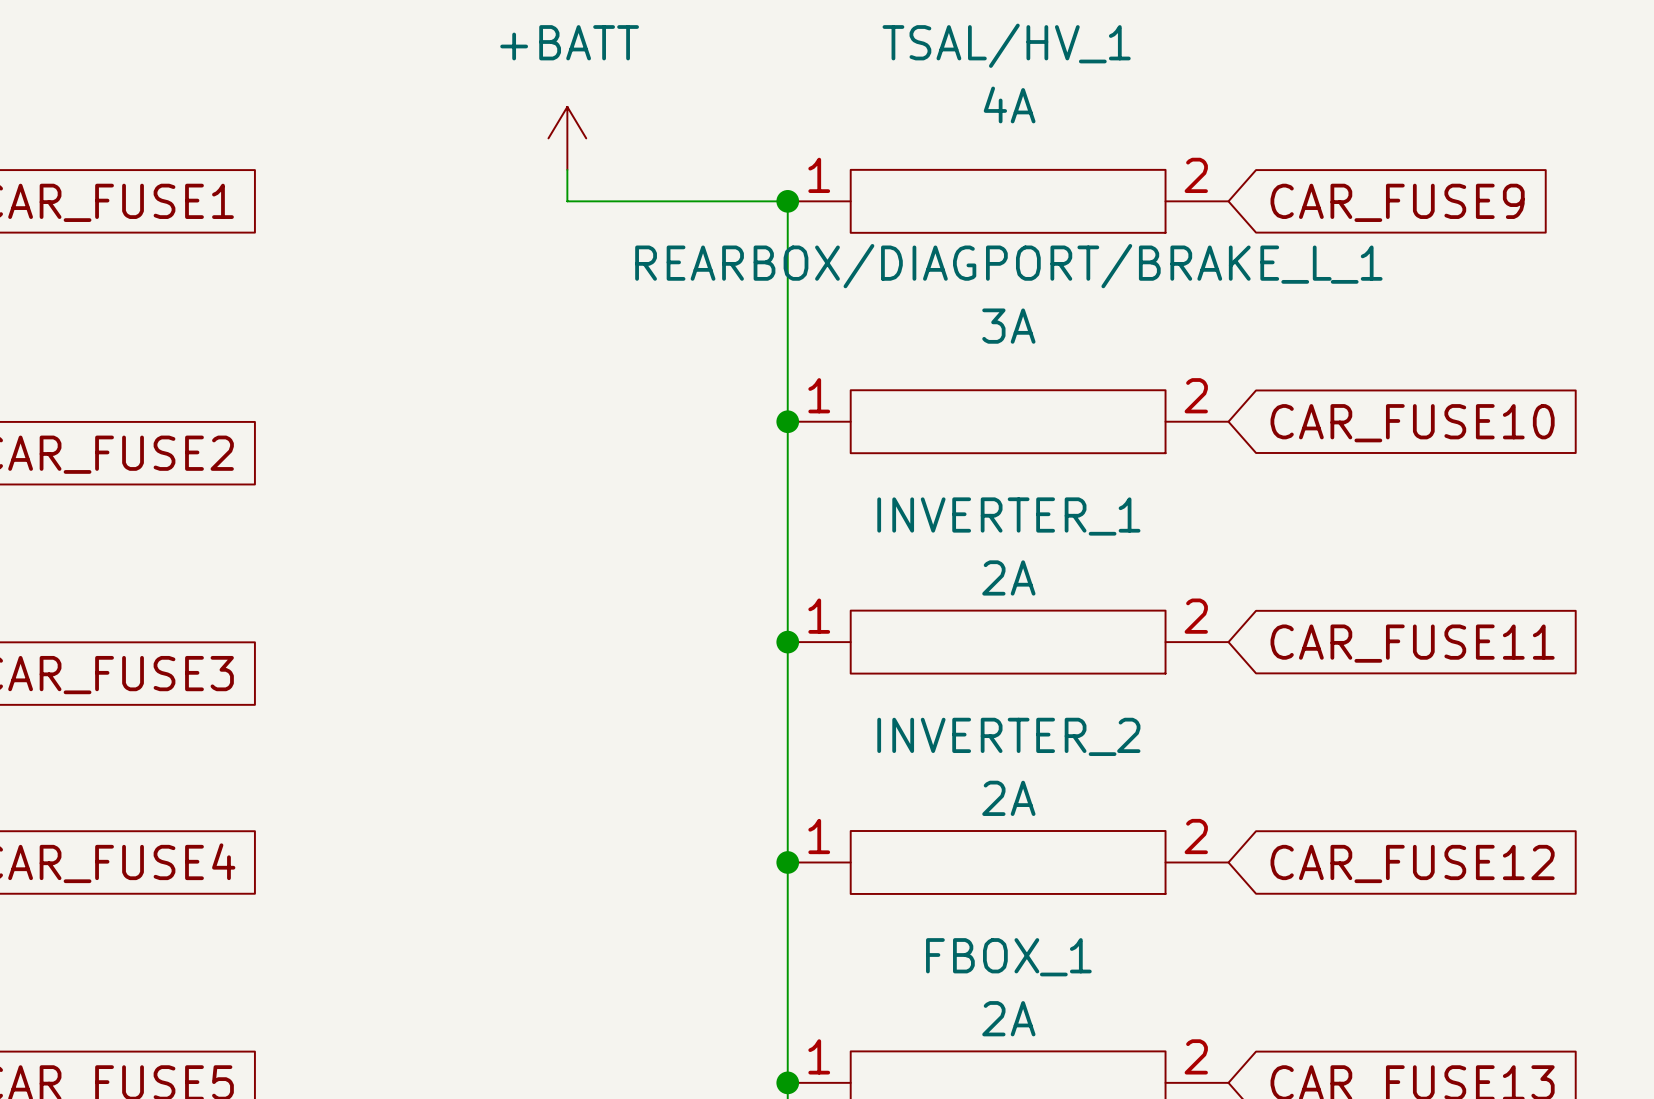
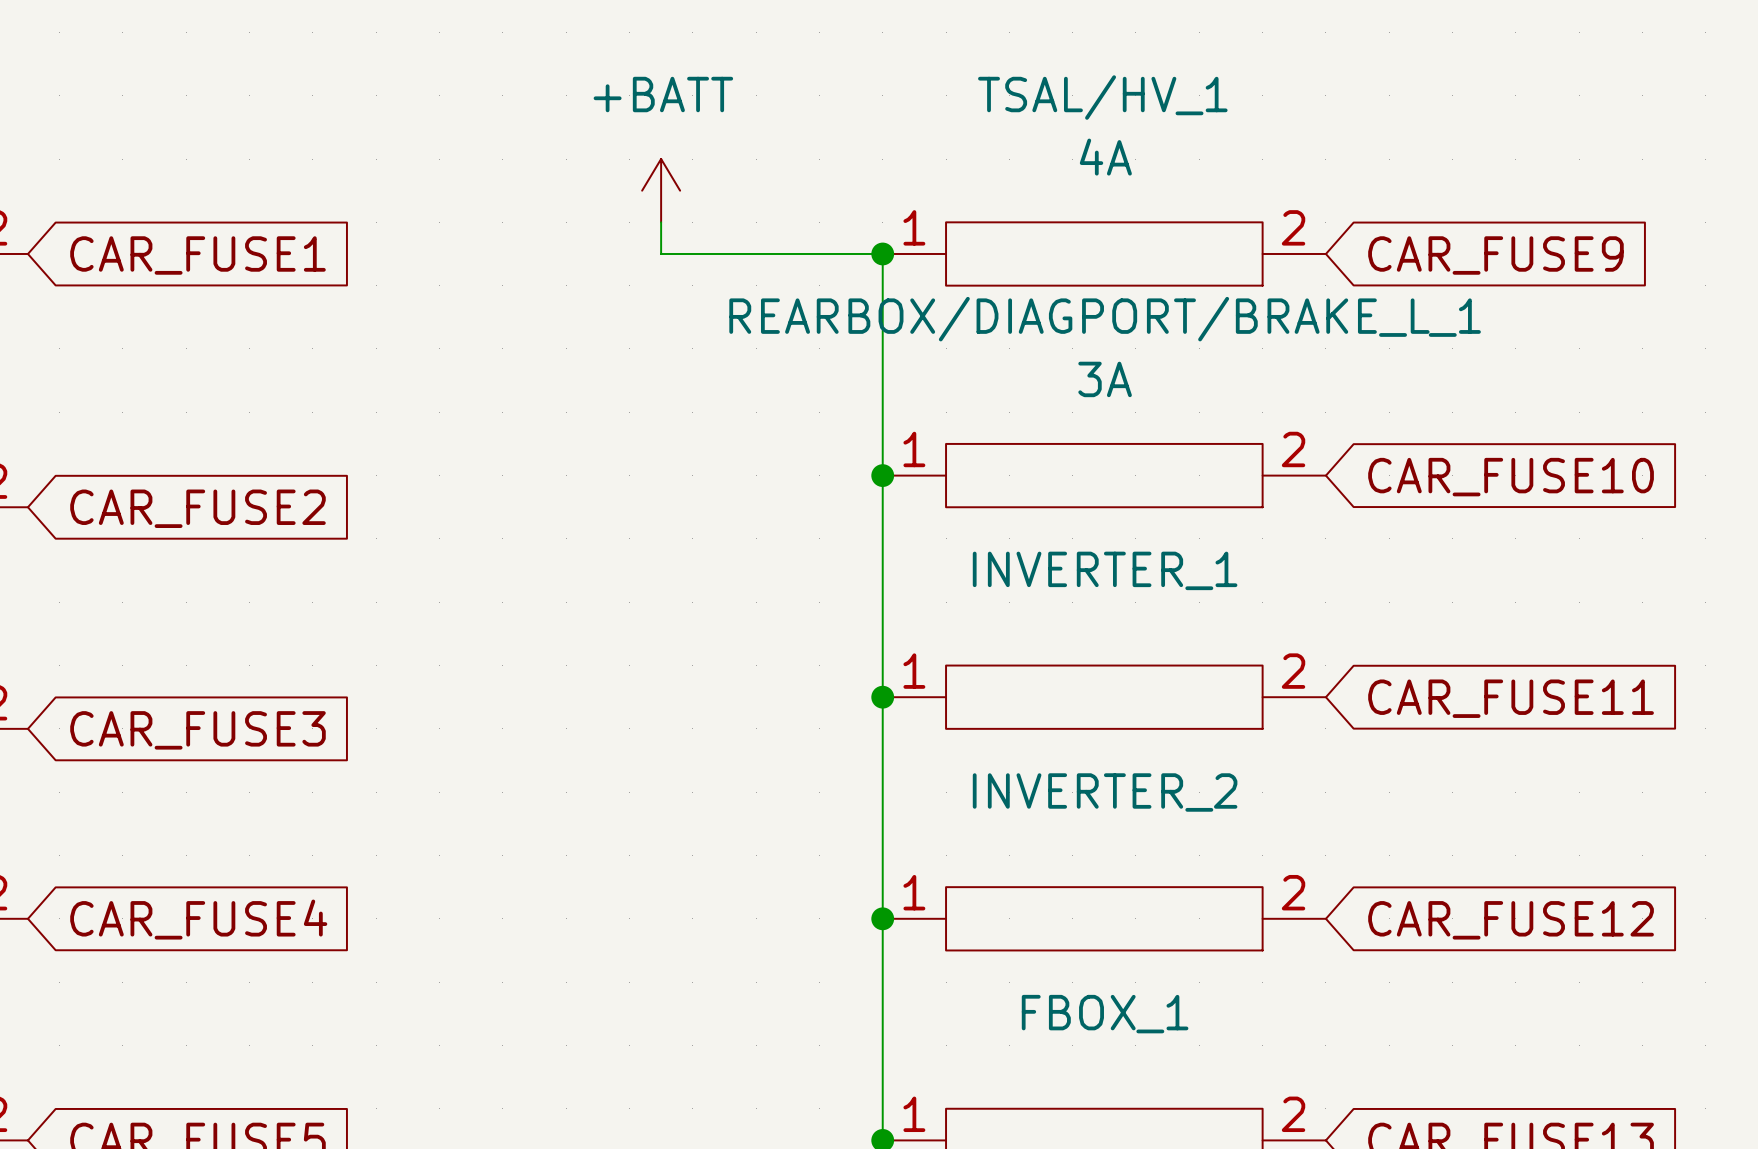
INVERTER_1 value: 2A (1008, 577) -> none
INVERTER_2 value: 2A (1008, 798) -> none
FBOX_1 value: 2A (1008, 1018) -> none

